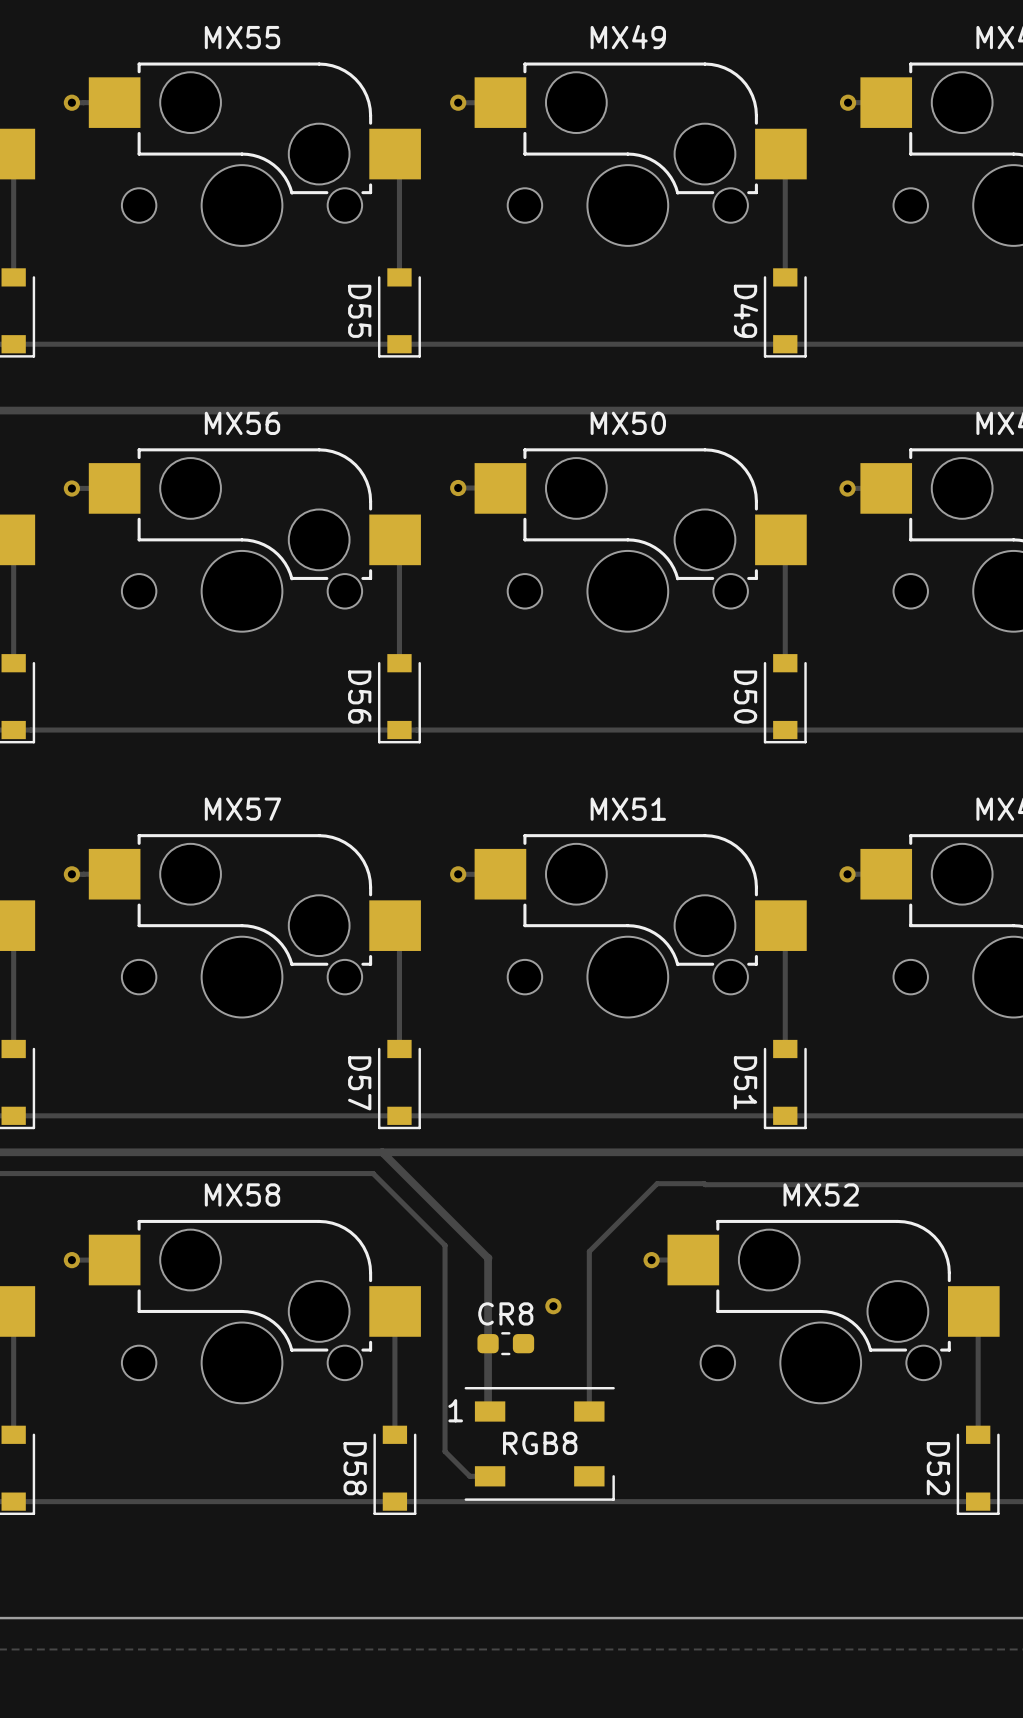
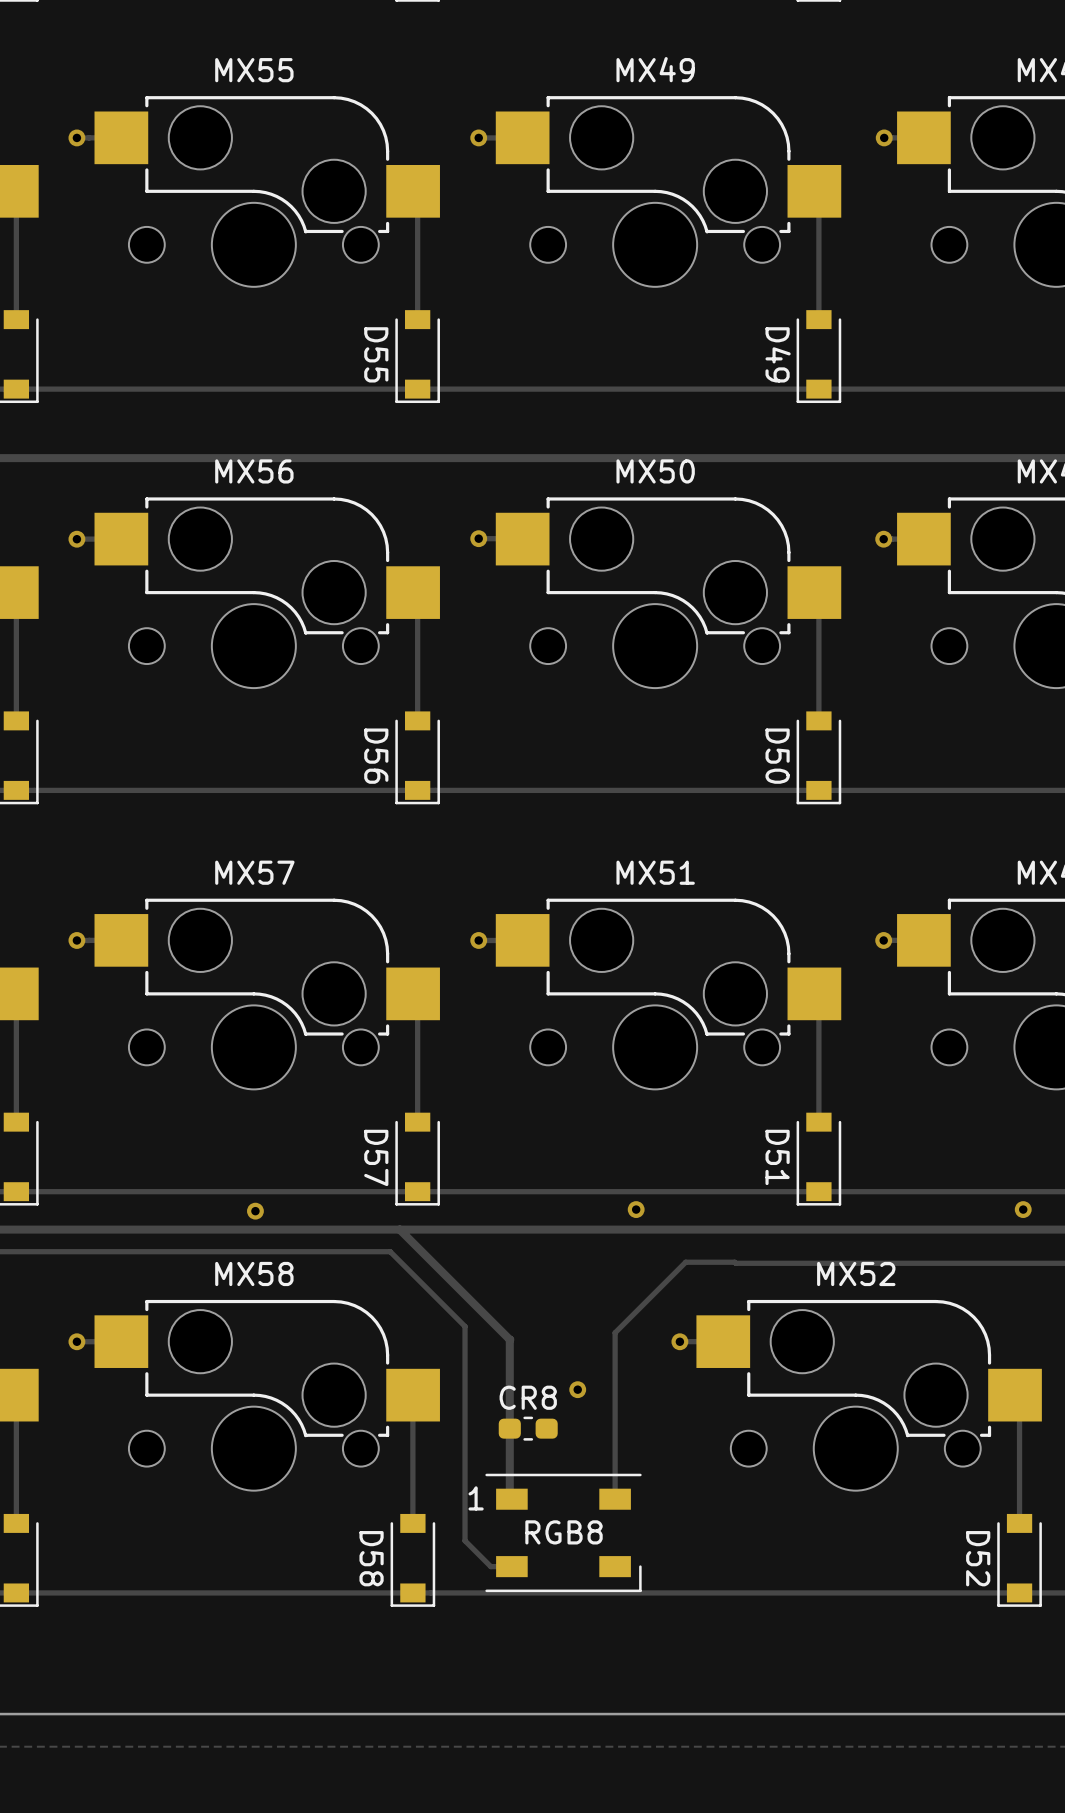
via: none -> (636, 1209)
via: none -> (1023, 1209)
via: none -> (255, 1211)

